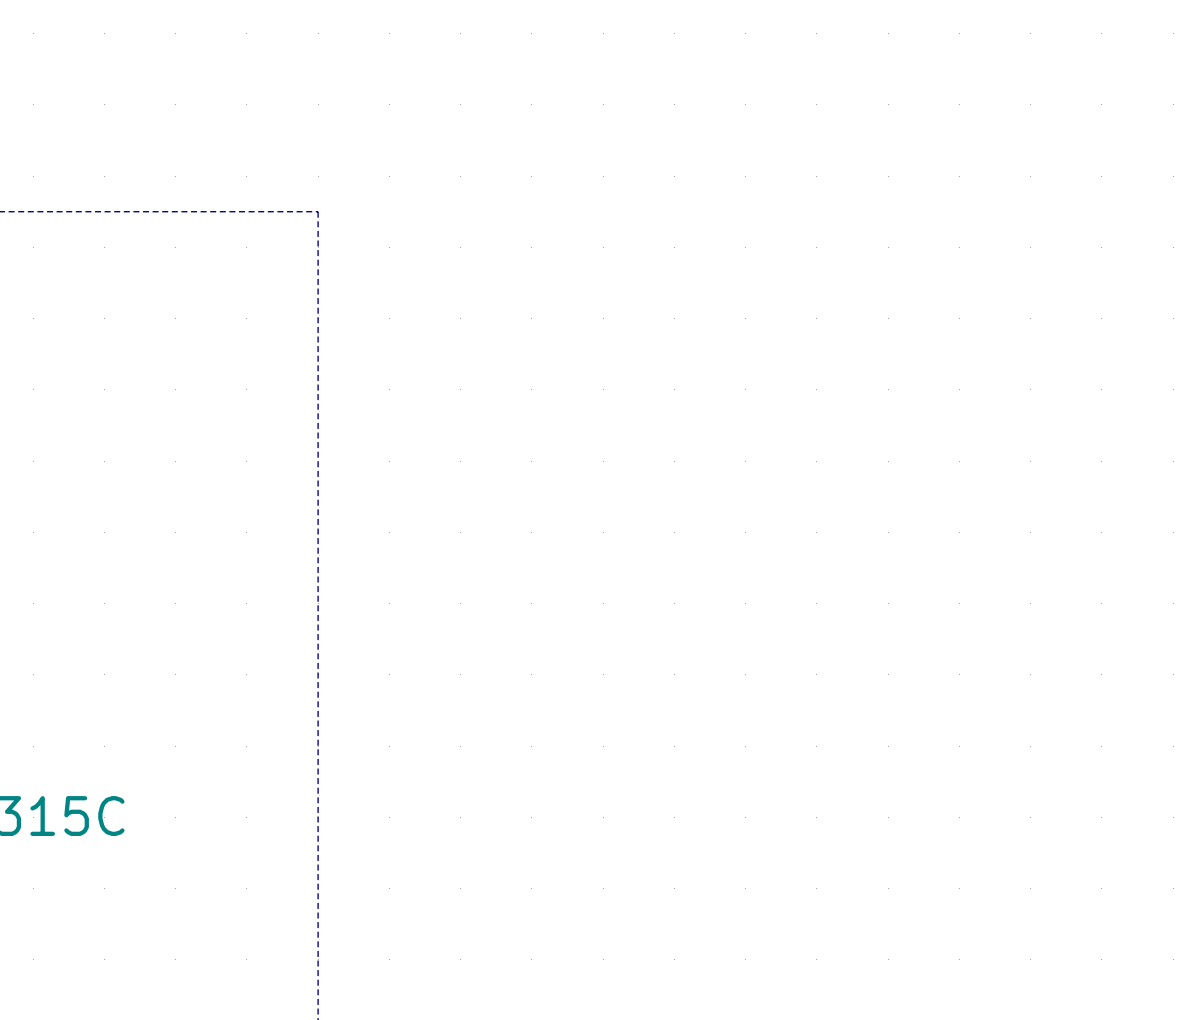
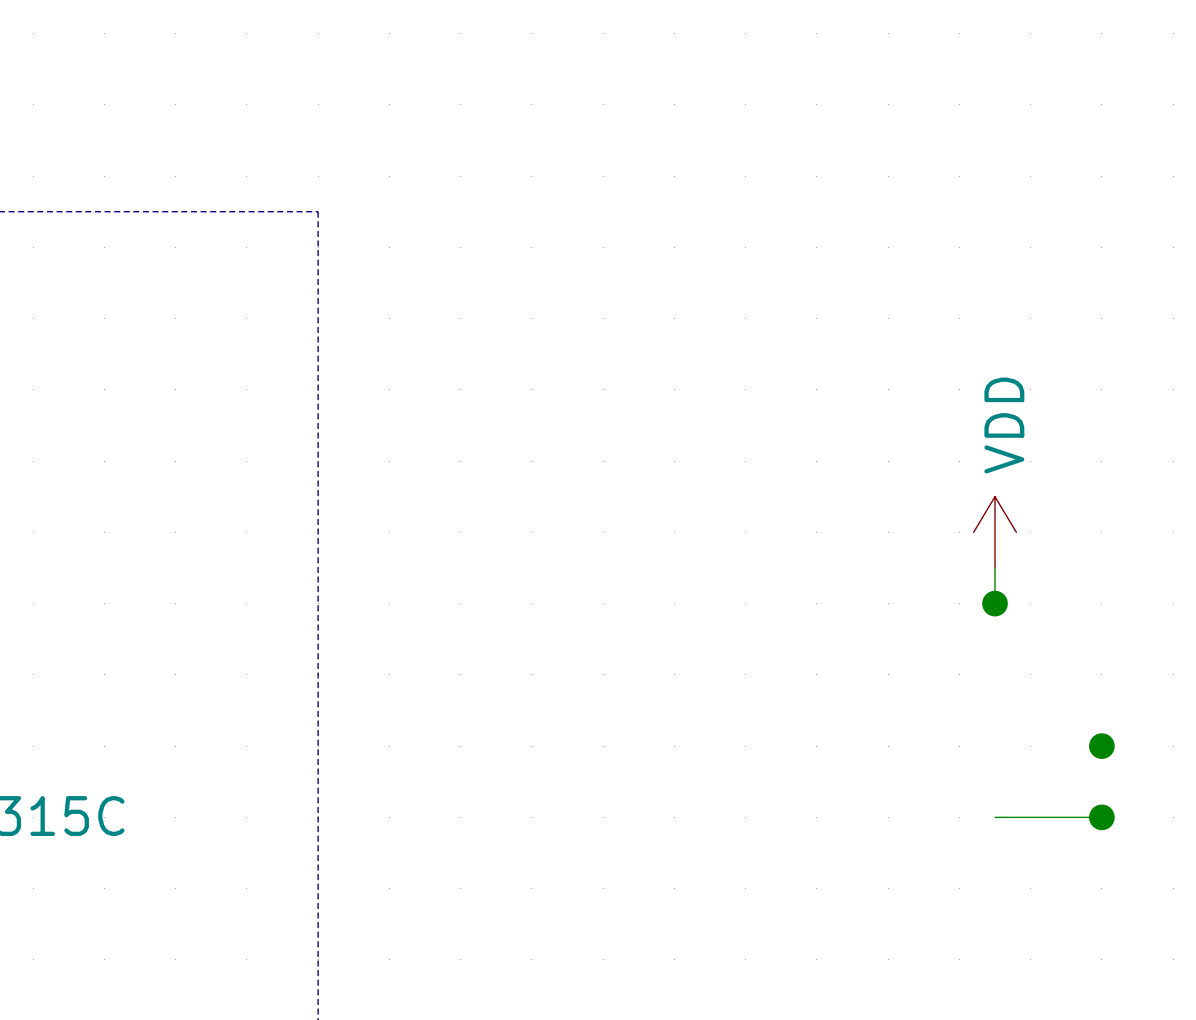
power symbol: none -> VDD (995, 532)
wire: none -> (995, 567) (995, 603)
junction: none -> (995, 603)
junction: none -> (1101, 746)
wire: none -> (995, 817) (1101, 817)
junction: none -> (1101, 817)

